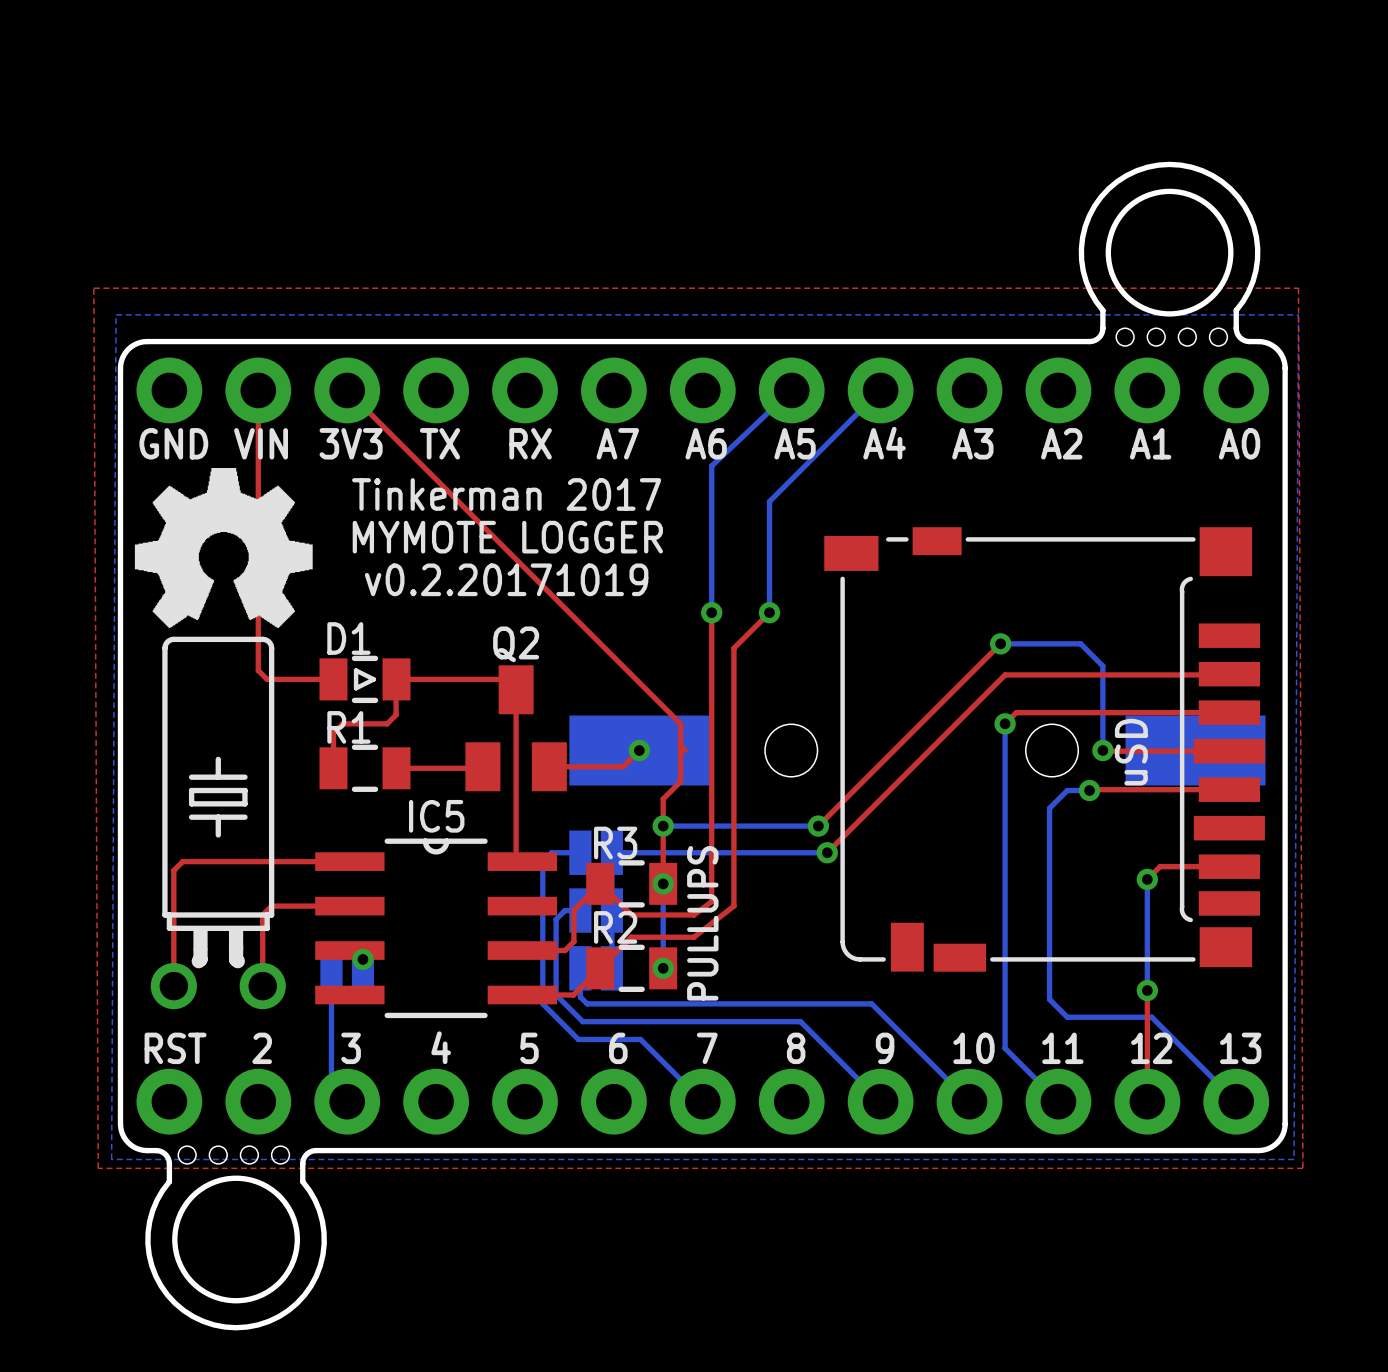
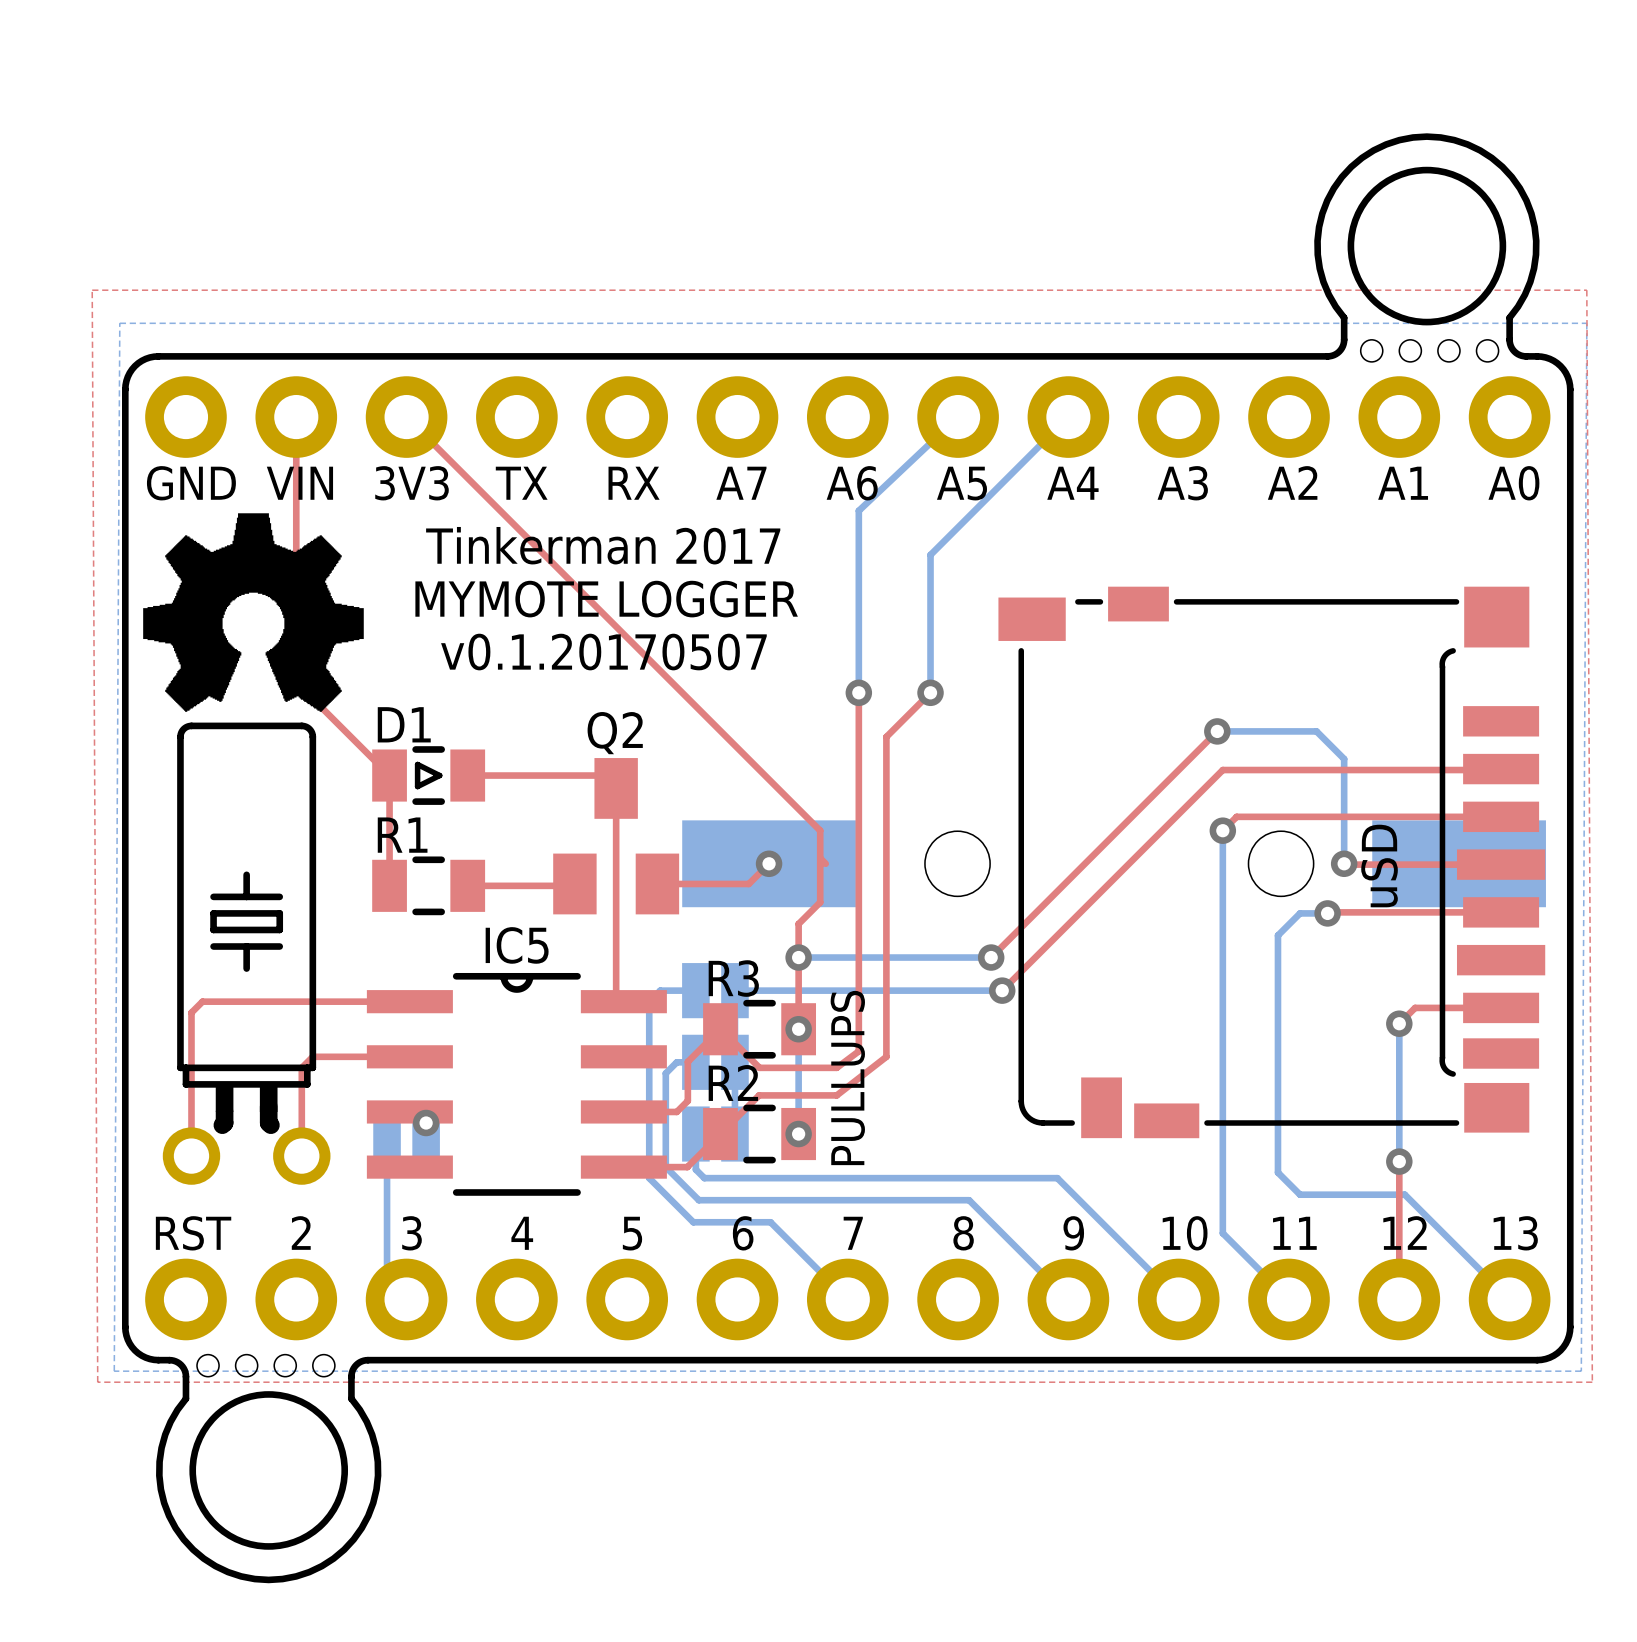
text: v0.2.20171019 (506, 579) -> v0.1.20170507 (603, 652)
top track: (258, 604) (258, 670) (267, 679) (333, 679) -> (296, 682) (389, 775) (389, 842)
top track: (396, 679) (396, 714) (387, 723) (342, 723) (333, 733) -> none

